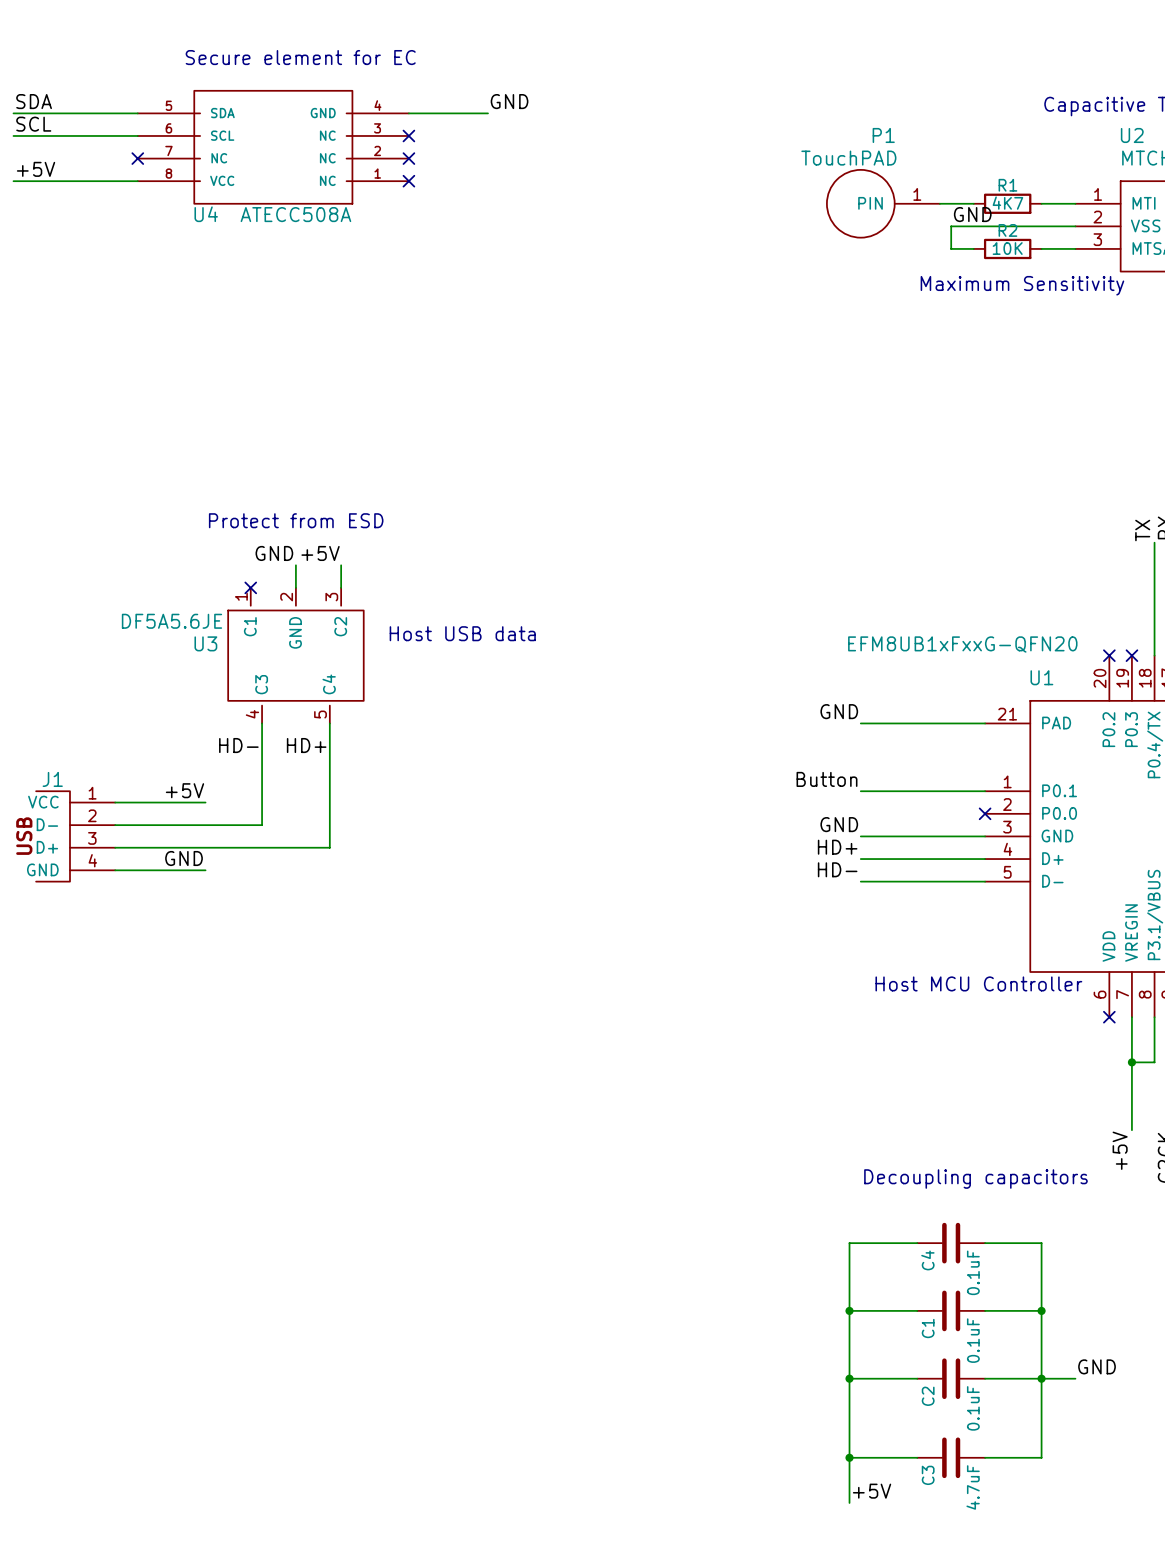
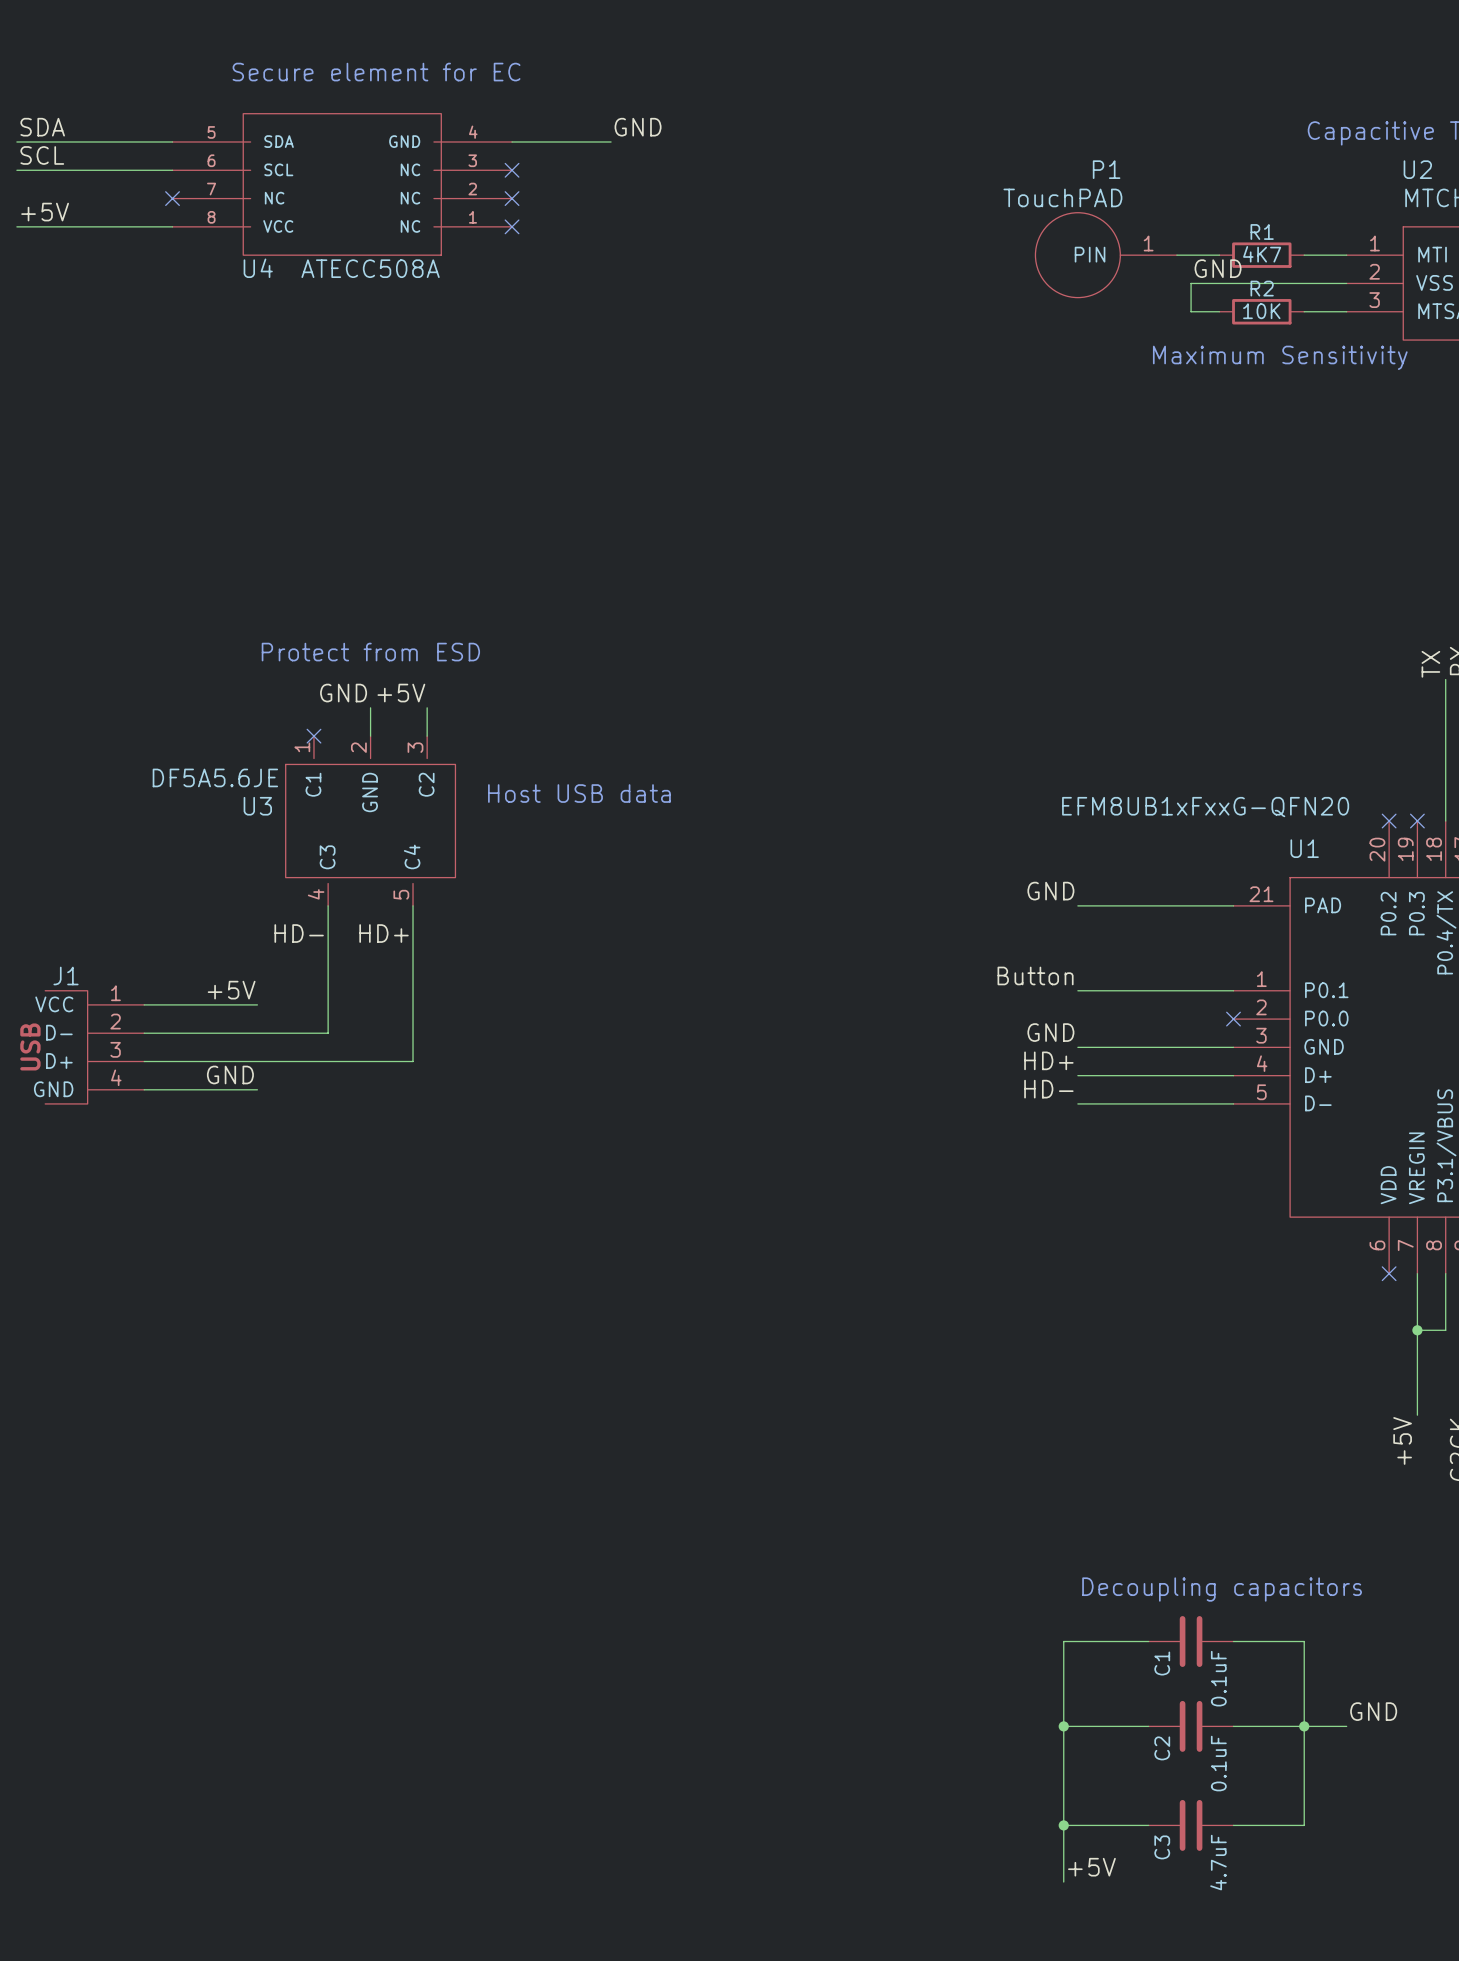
text: Host MCU Controller (978, 983) -> none
text position: Decoupling capacitors (975, 1179) -> Decoupling capacitors (1222, 1589)
wire: (917, 1243) (849, 1243) (849, 1310) -> none
C4: 0.1uF (951, 1243) -> none
wire: (985, 1243) (1041, 1243) (1041, 1310) -> none
junction: (849, 1310) -> none
junction: (1041, 1310) -> none

